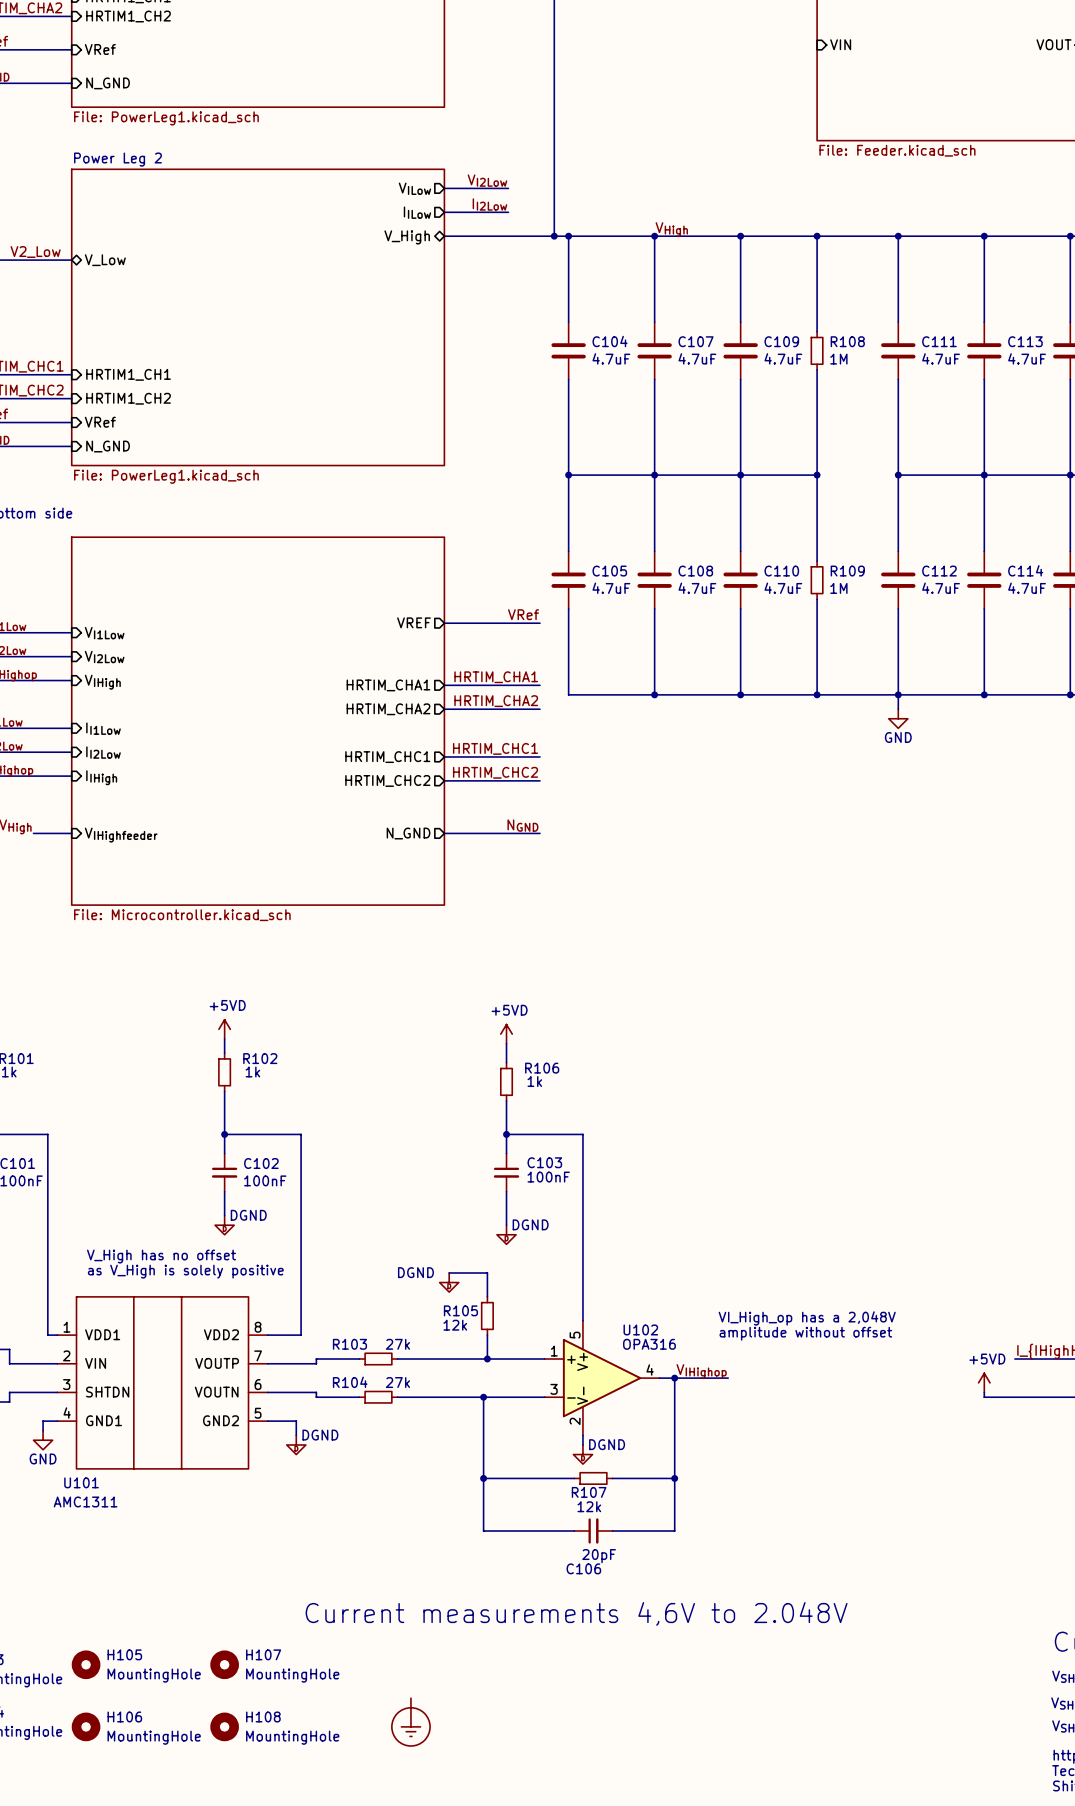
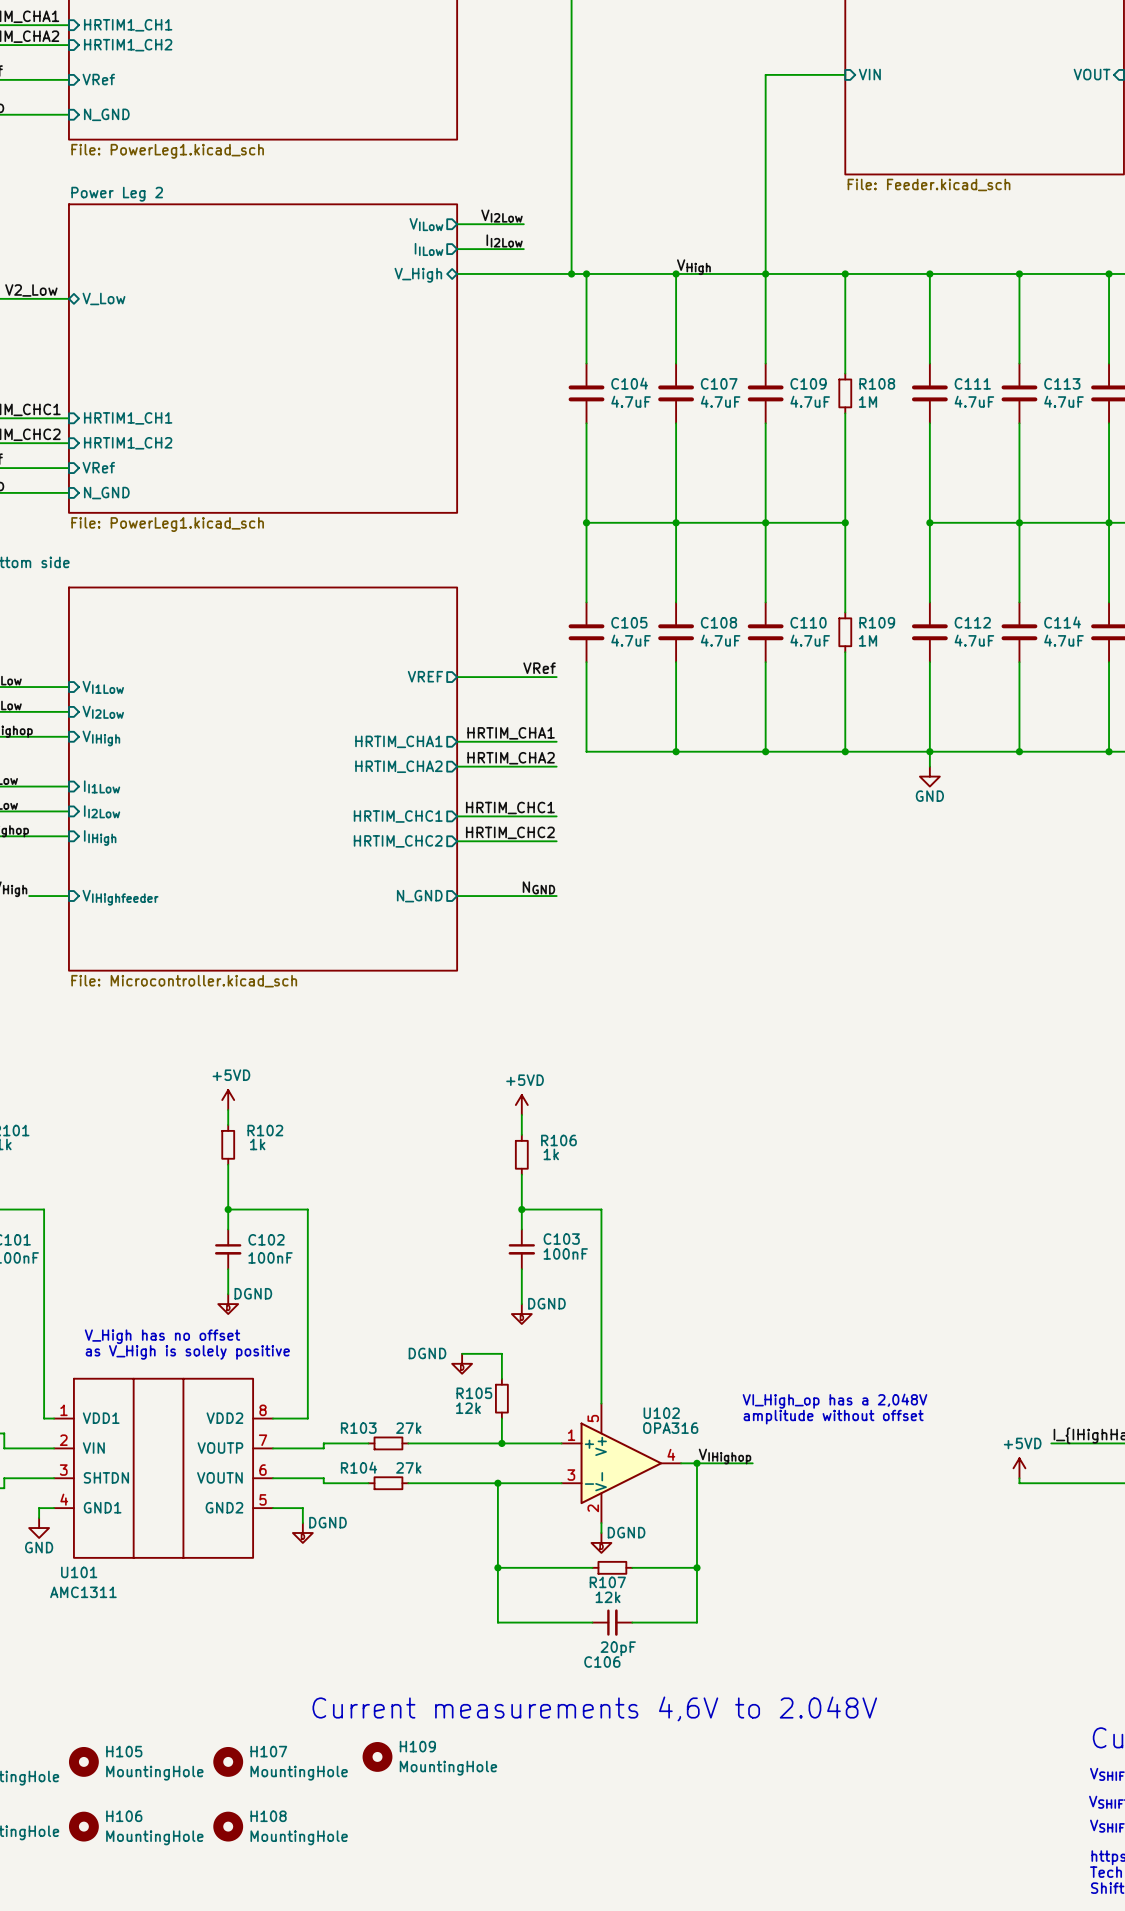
wire: none -> (845, 74) (765, 74) (765, 273)
H109: none -> MountingHole (377, 1756)
power symbol: (410, 1722) -> none

